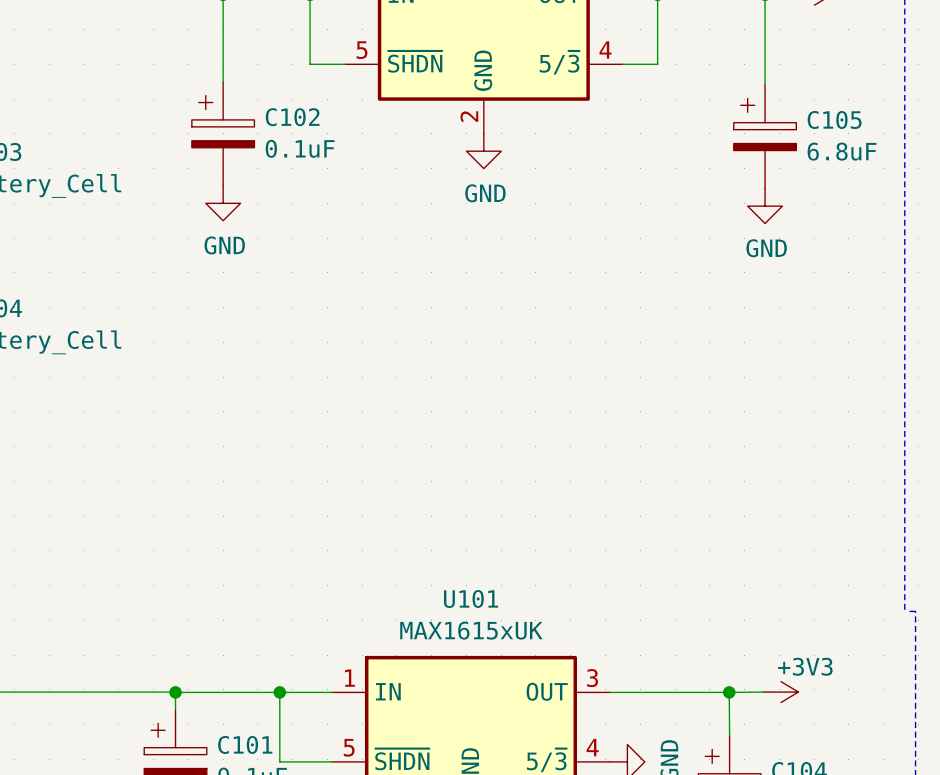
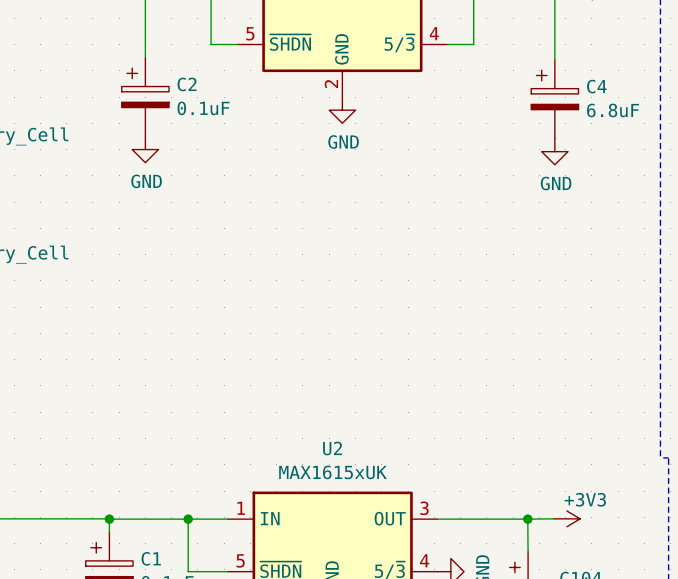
C102 name: C102 (292, 117) -> C2 (187, 84)
C105 name: C105 (834, 119) -> C4 (596, 86)
U101 name: U101 (471, 598) -> U2 (332, 448)
C101 name: C101 (245, 744) -> C1 (151, 558)

